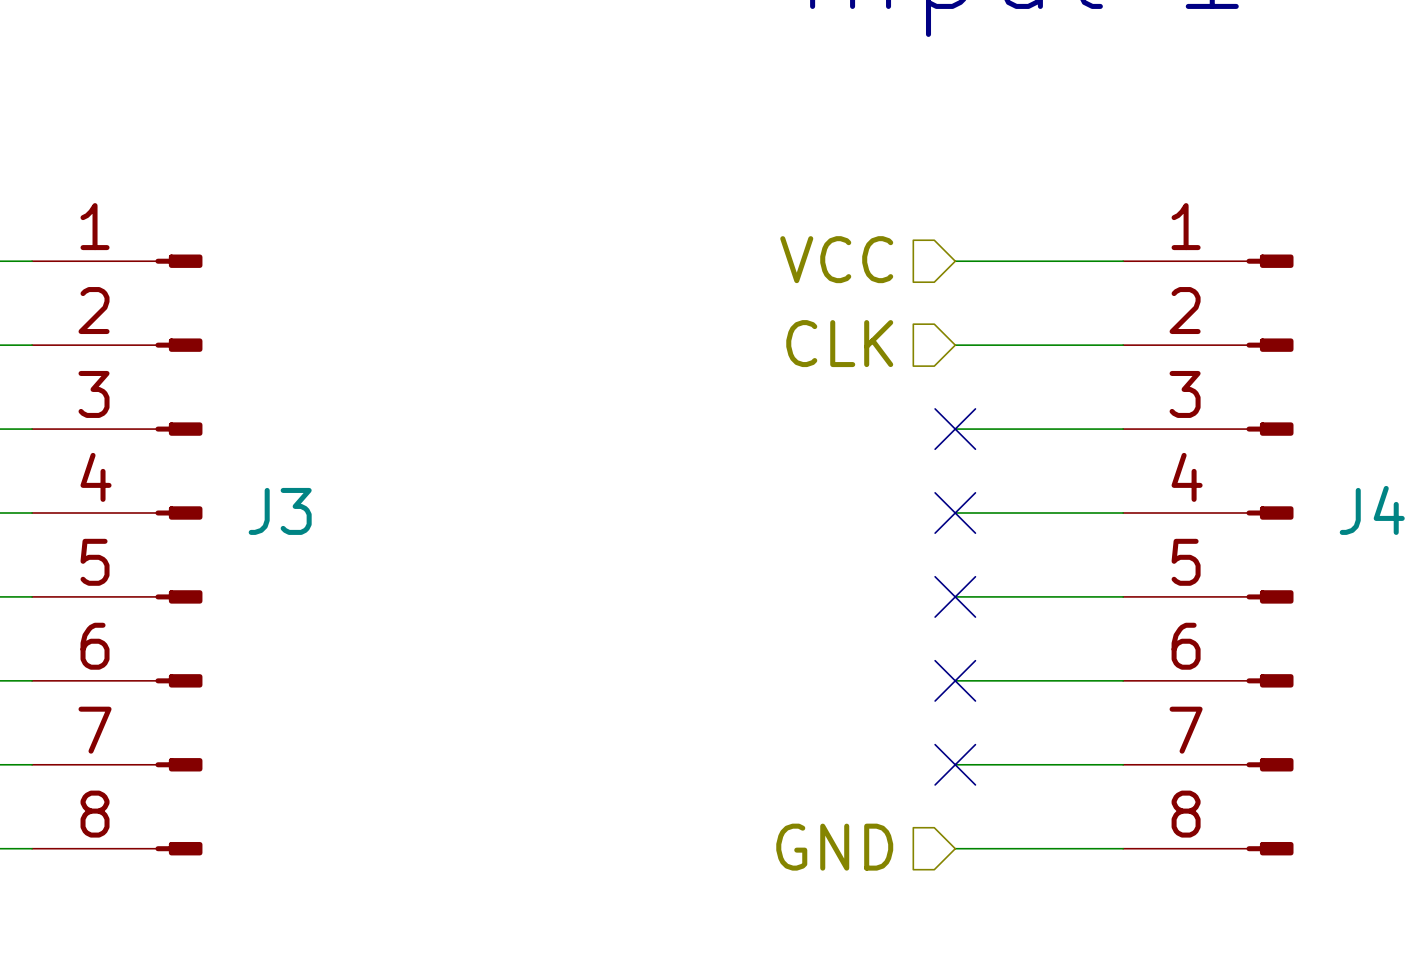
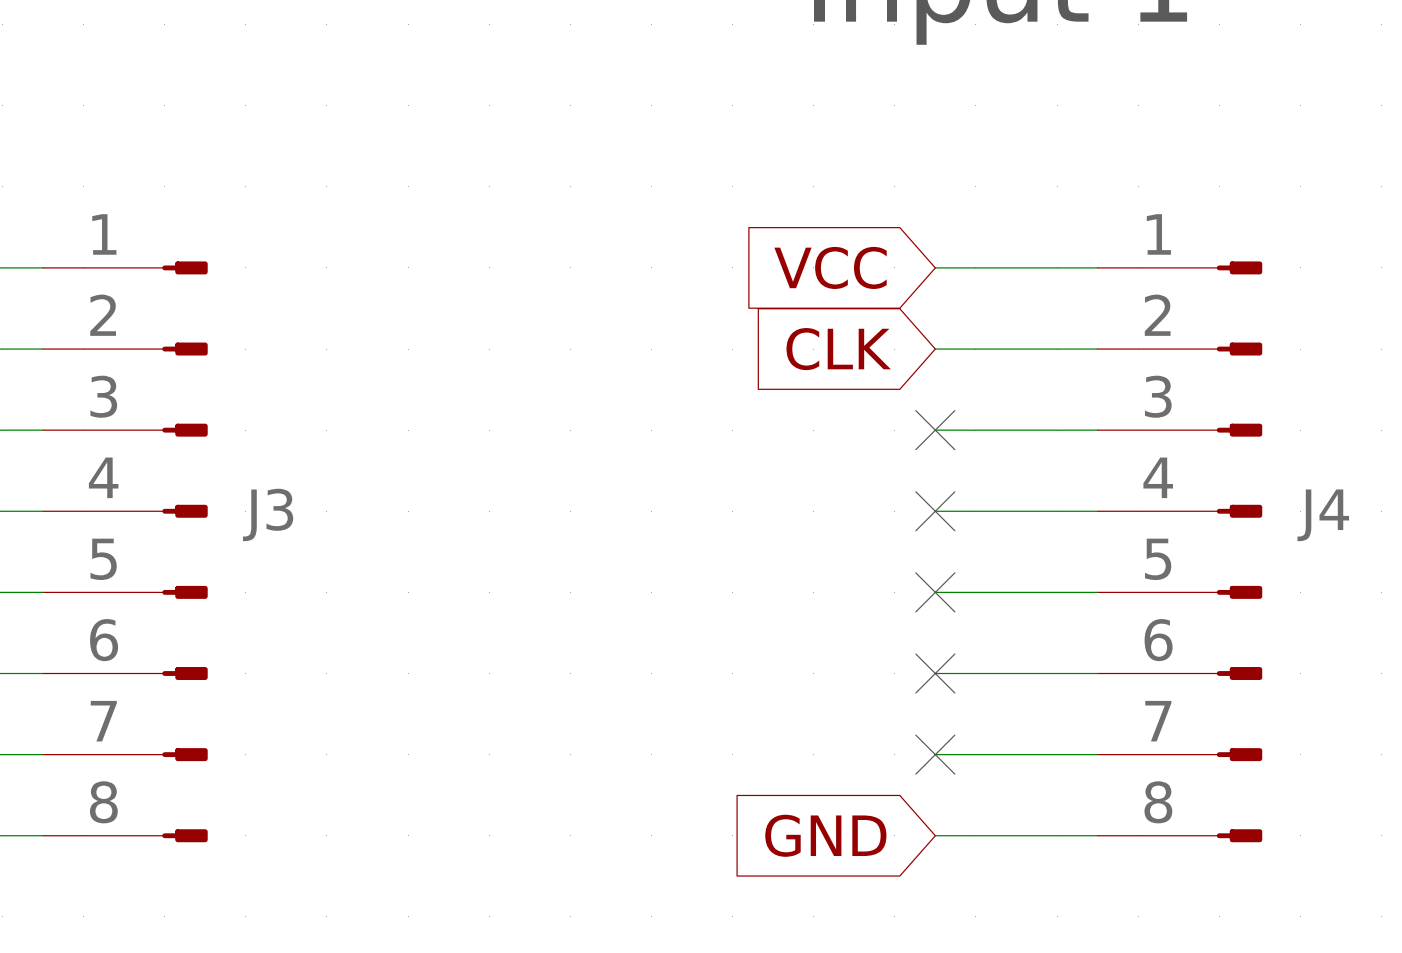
hierarchical label: VCC (836, 259) -> none
global label: none -> VCC (830, 267)
hierarchical label: CLK (839, 343) -> none
global label: none -> CLK (838, 349)
hierarchical label: GND (834, 847) -> none
global label: none -> GND (825, 835)

